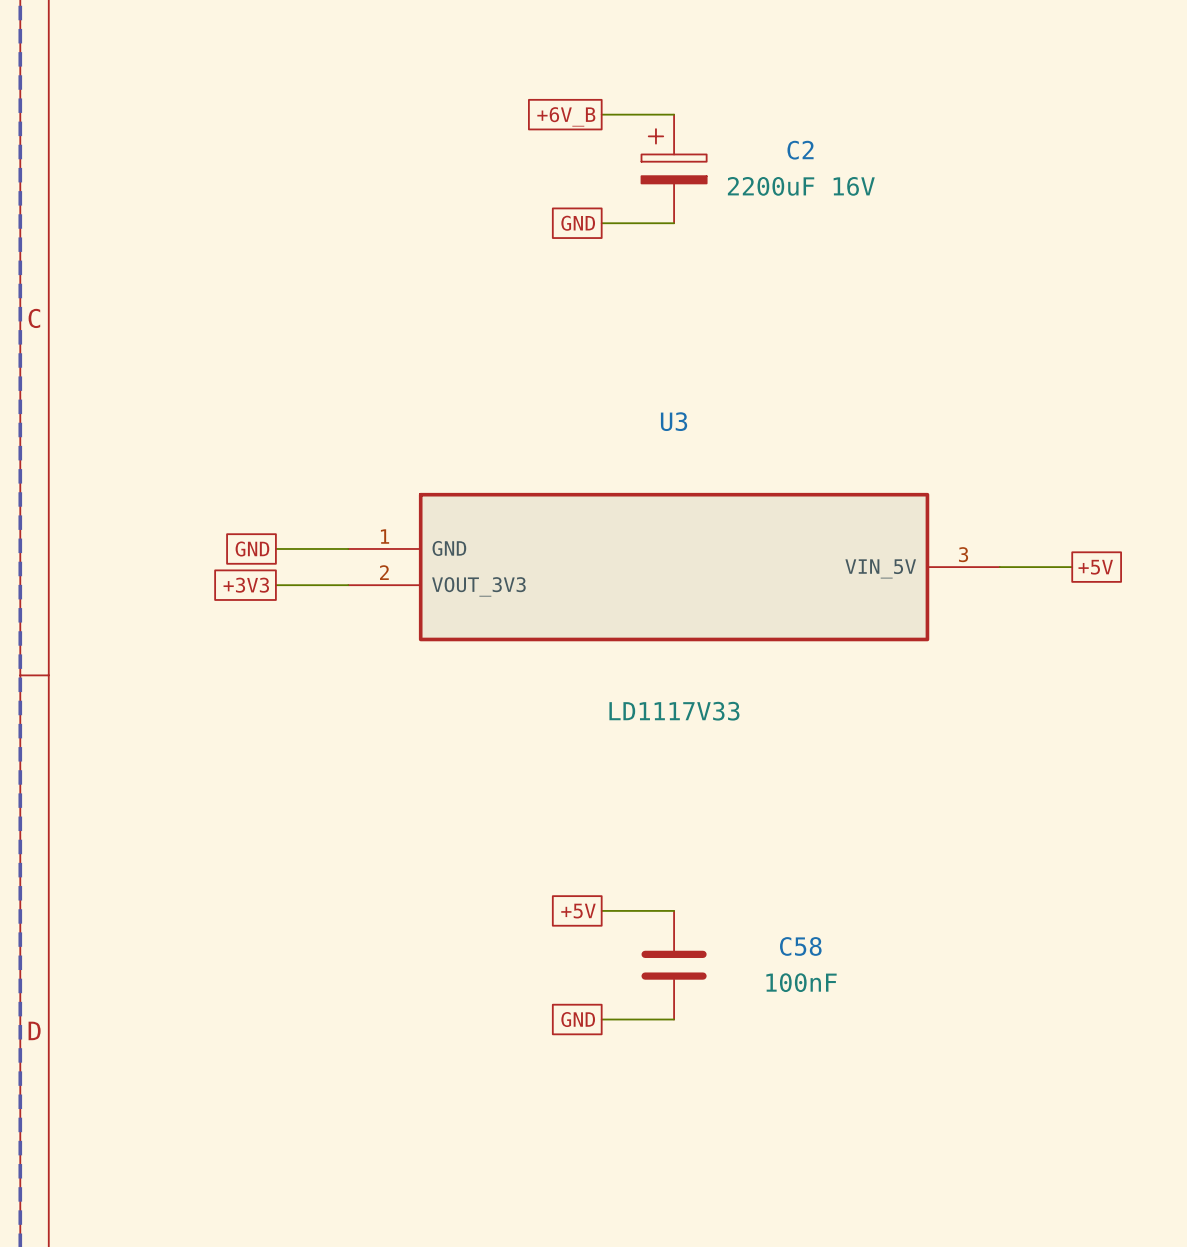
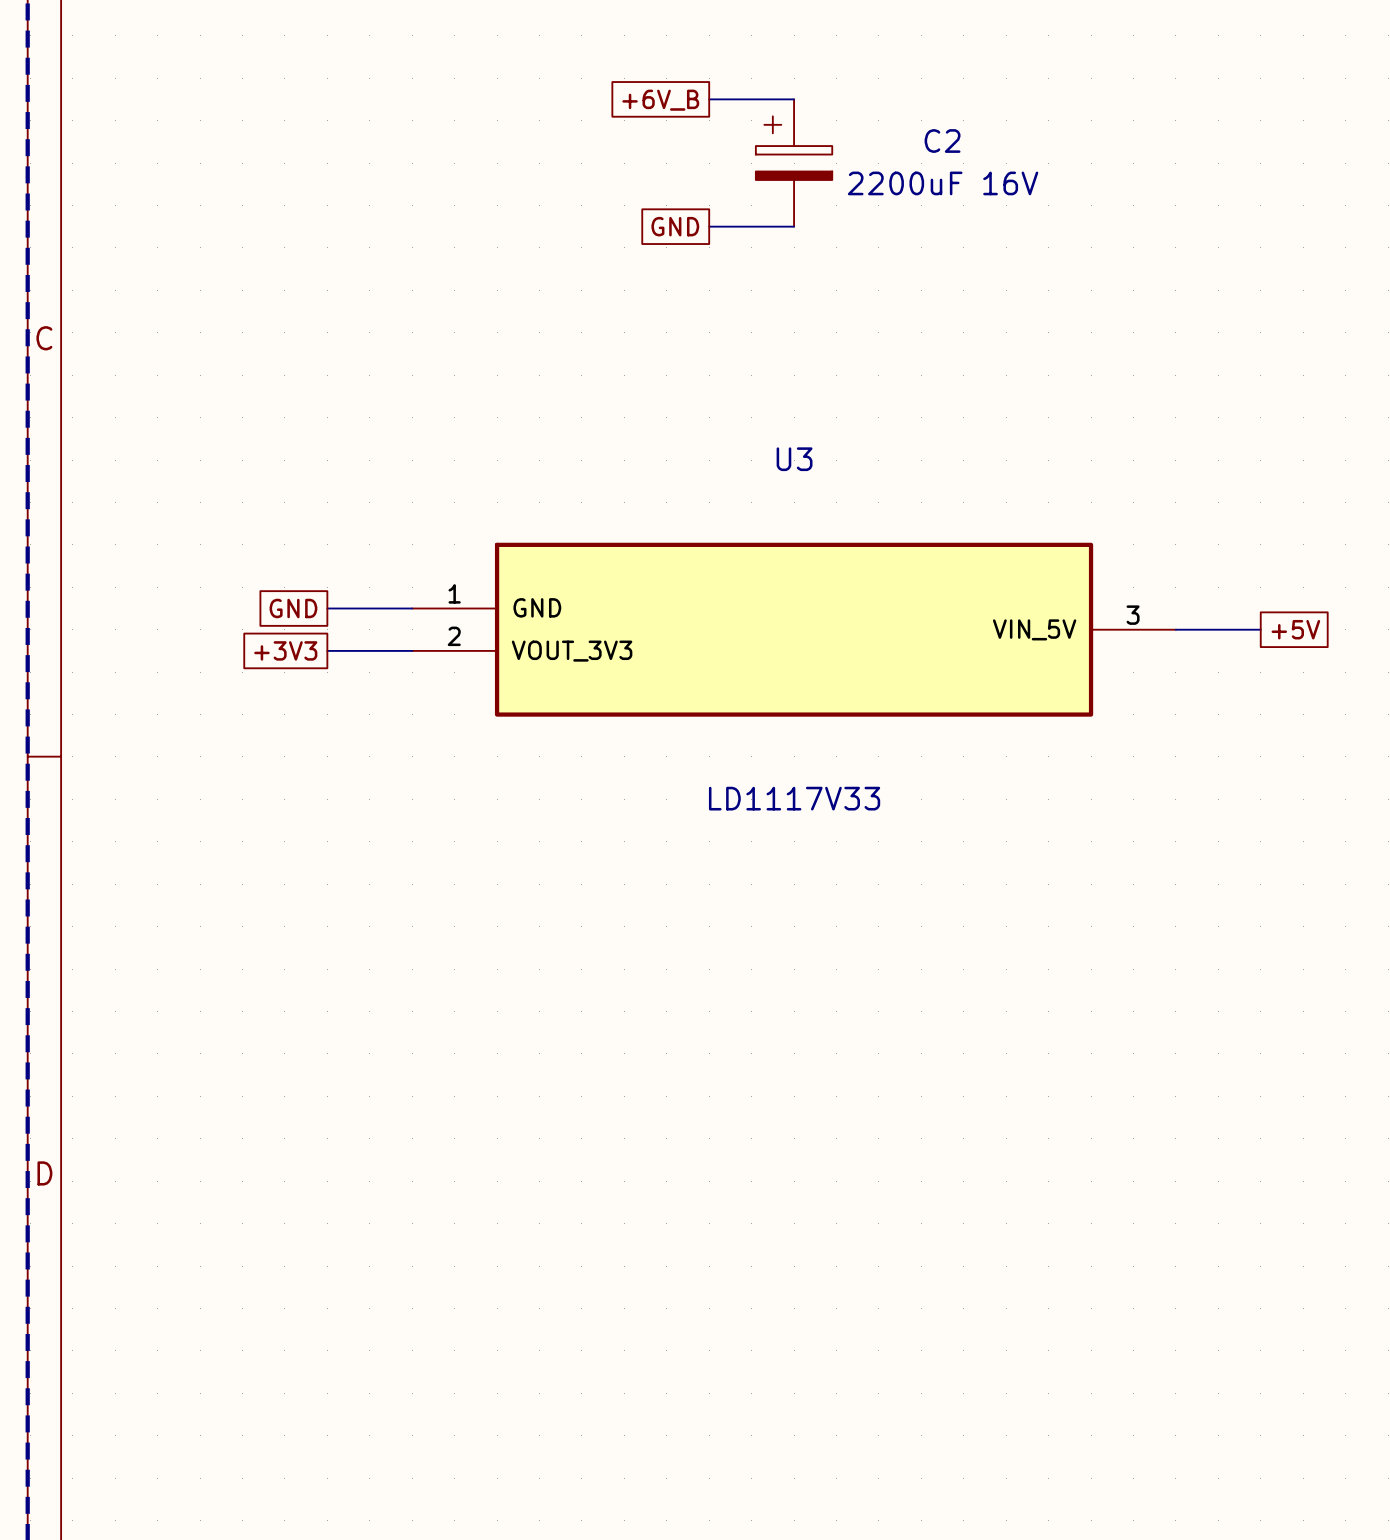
wire: (601, 910) (674, 910) -> none
global label: +5V (578, 911) -> none
C58: 100nF (674, 965) -> none
global label: GND (578, 1019) -> none
wire: (601, 1019) (674, 1019) -> none

